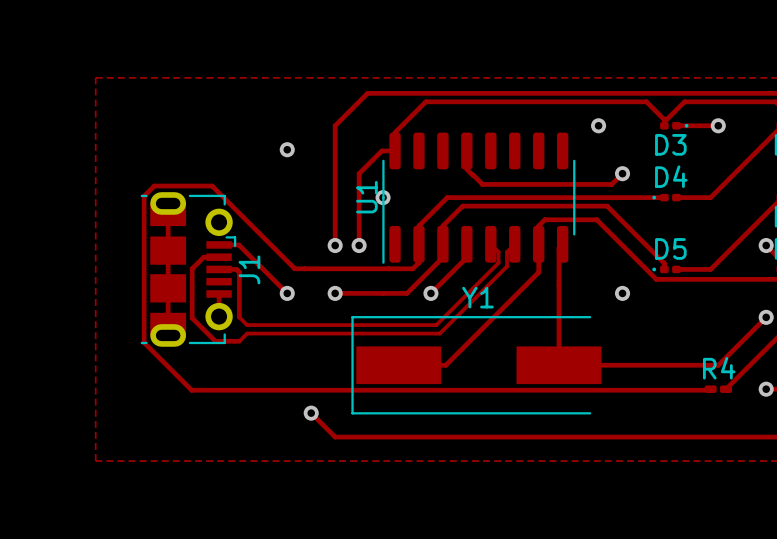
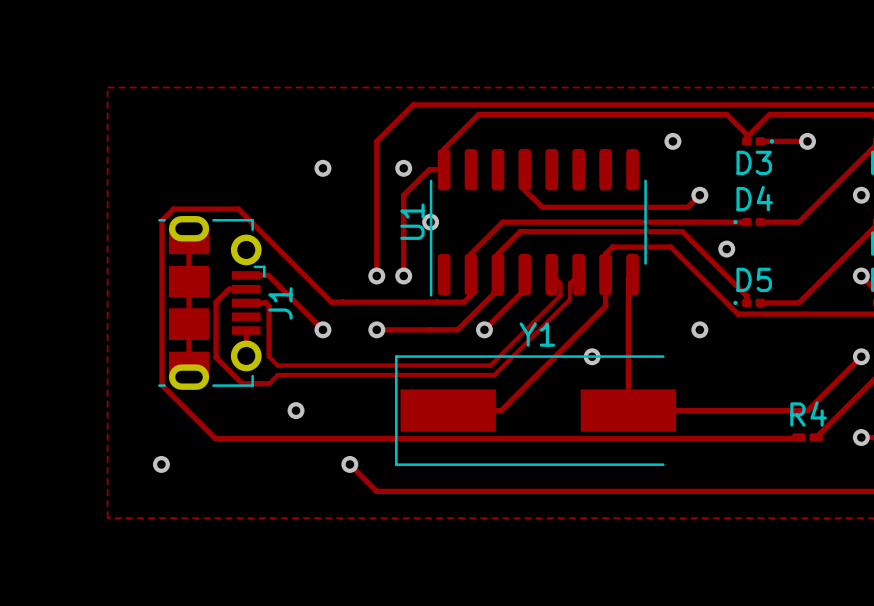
via: none -> (403, 168)
via: none -> (861, 195)
via: none -> (726, 249)
via: none -> (592, 356)
via: none -> (296, 410)
via: none -> (161, 464)

